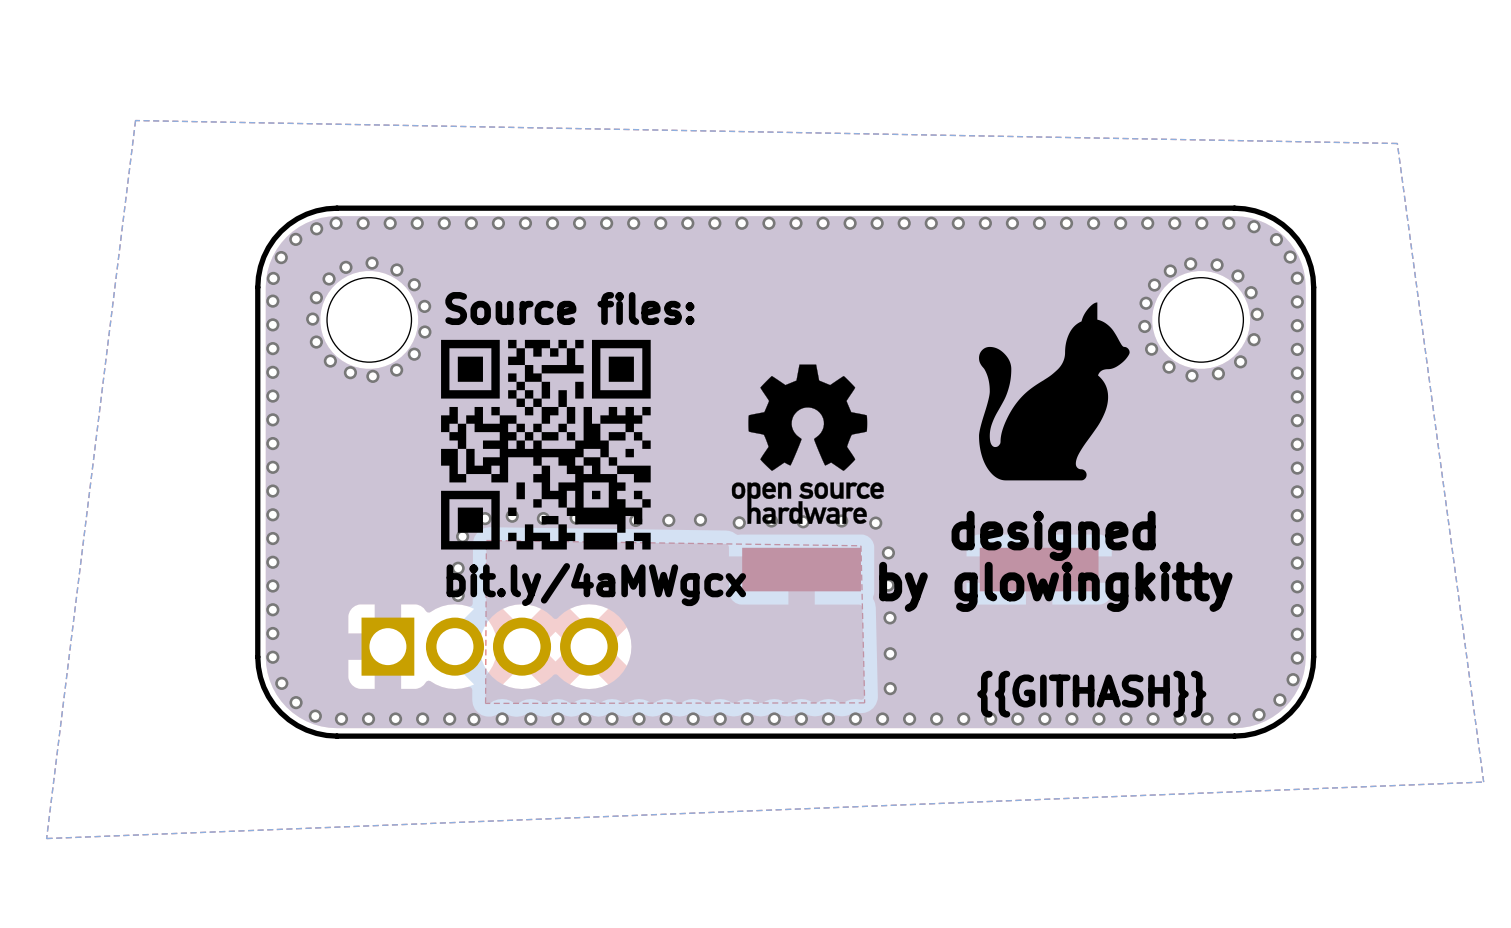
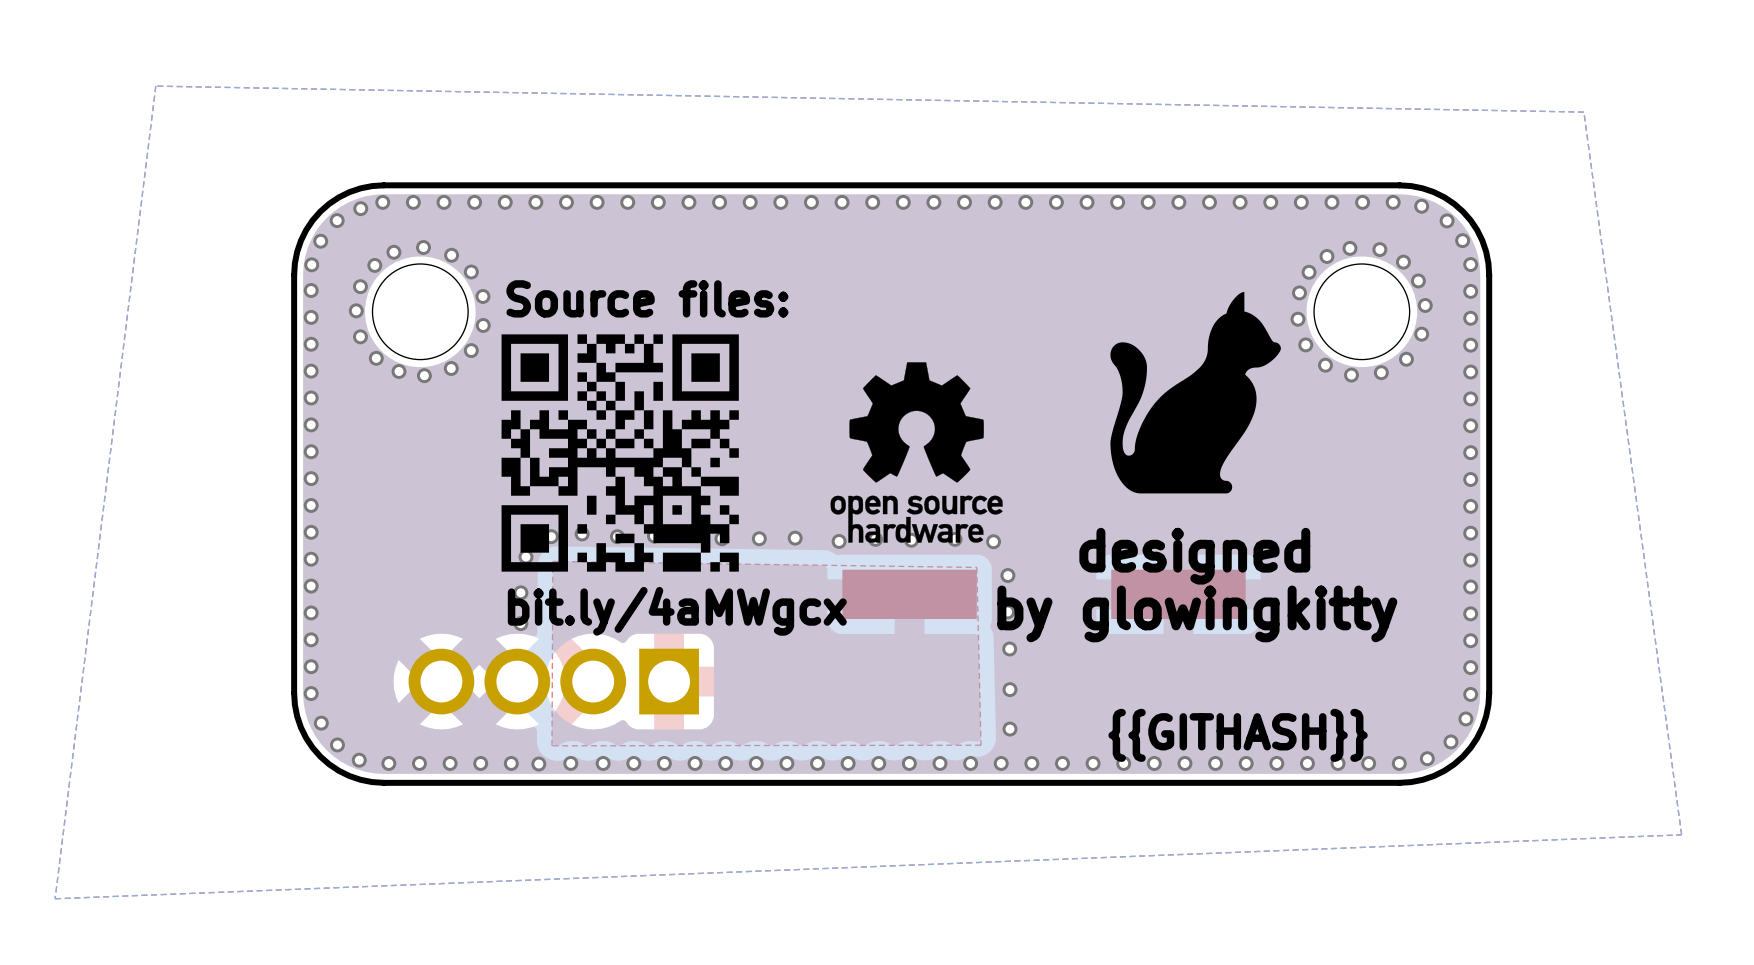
part rotation: 0° (489, 646) -> 180° (553, 681)

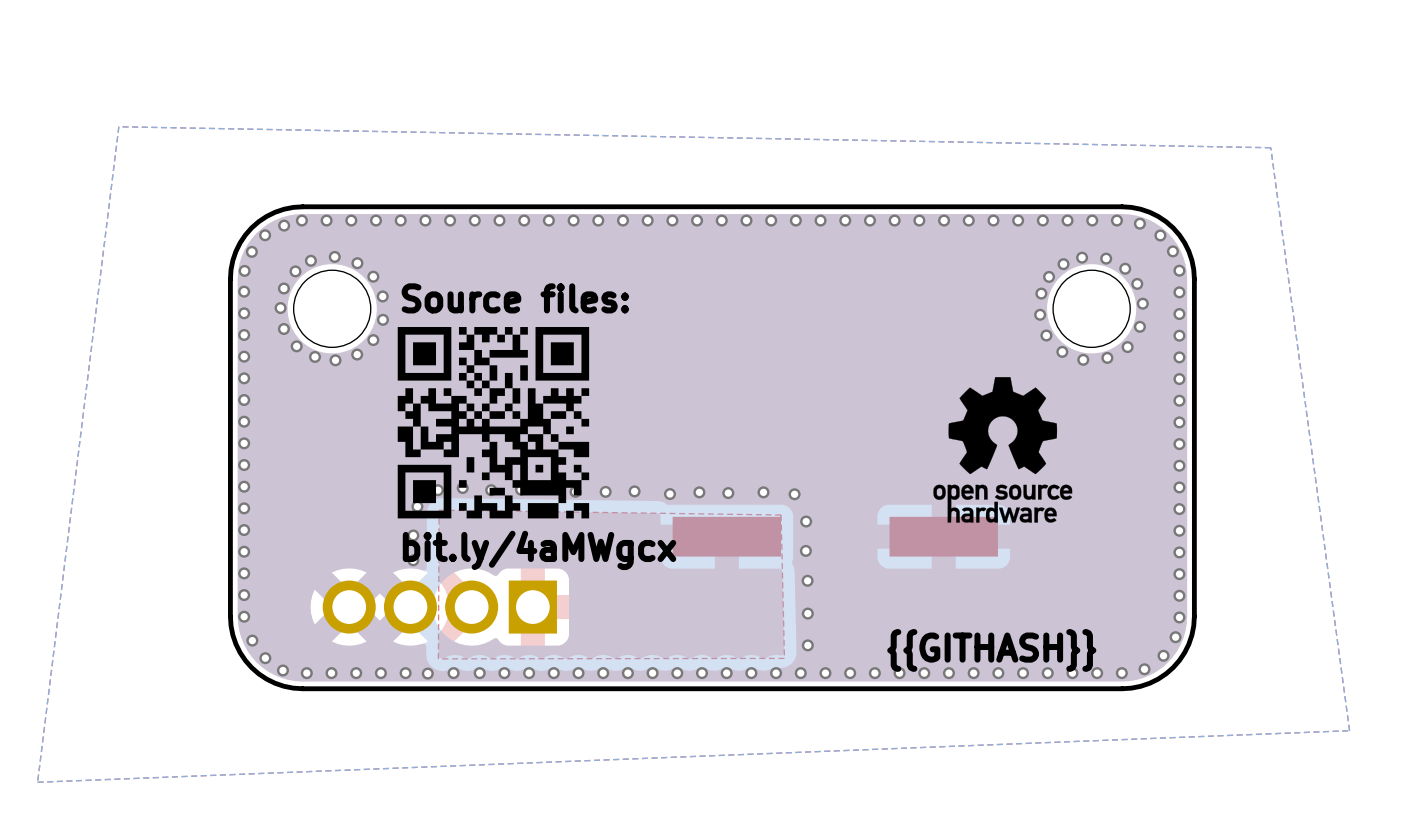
drawing: [1110, 292, 1281, 494] -> none
drawing position: (916, 452) -> (1002, 449)
text: designed (1194, 556) -> none
text: by glowingkitty (1197, 613) -> none

